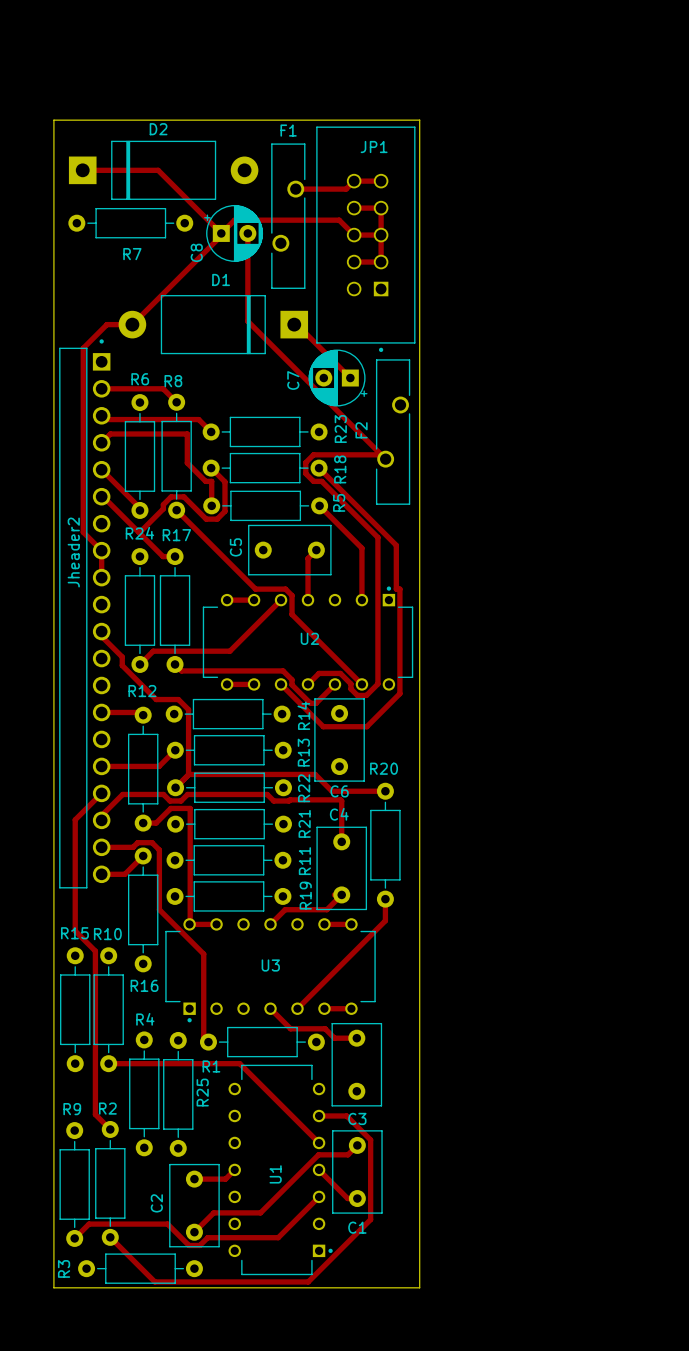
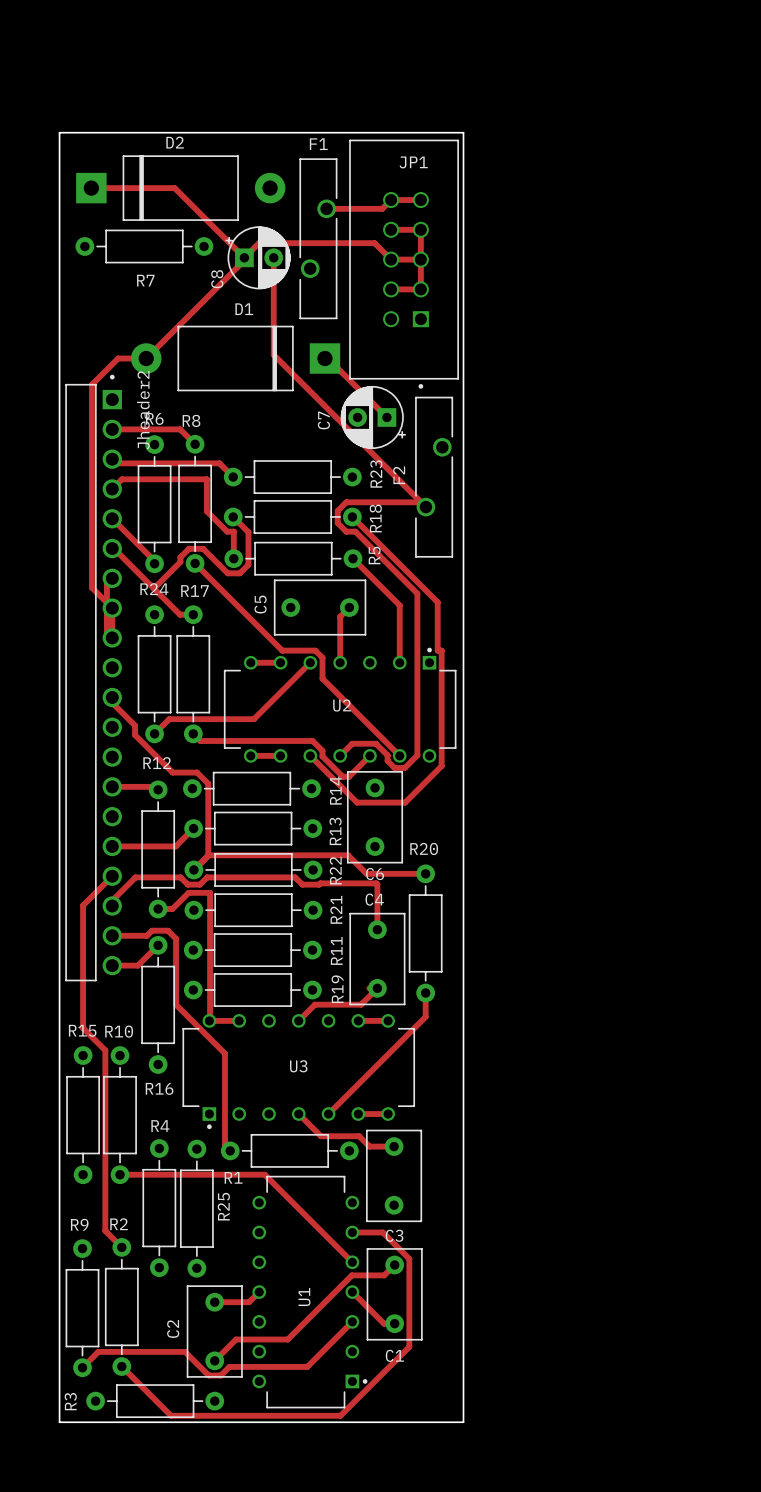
track: none -> (106, 578) (106, 637)
Jheader2 name position: Jheader2 (73, 552) -> Jheader2 (143, 410)

